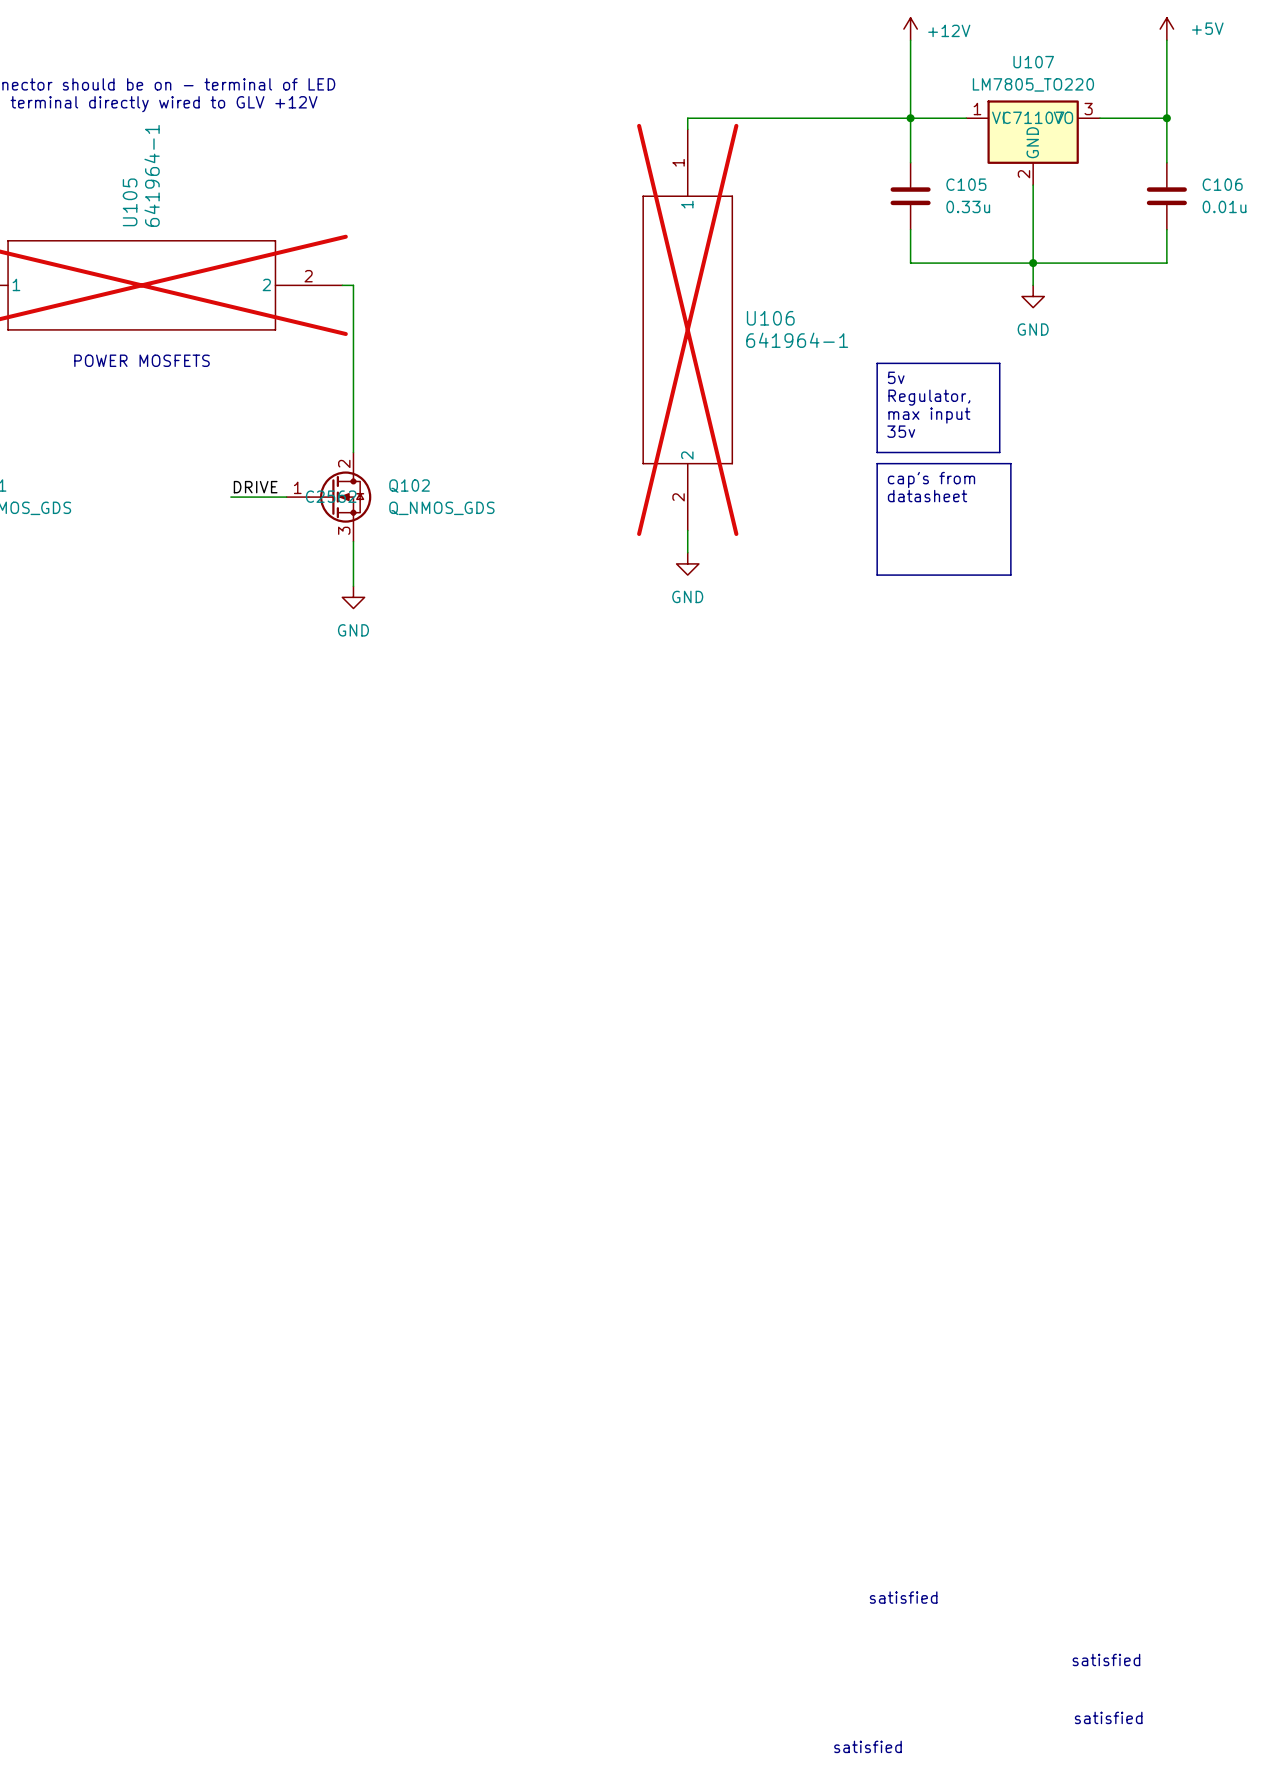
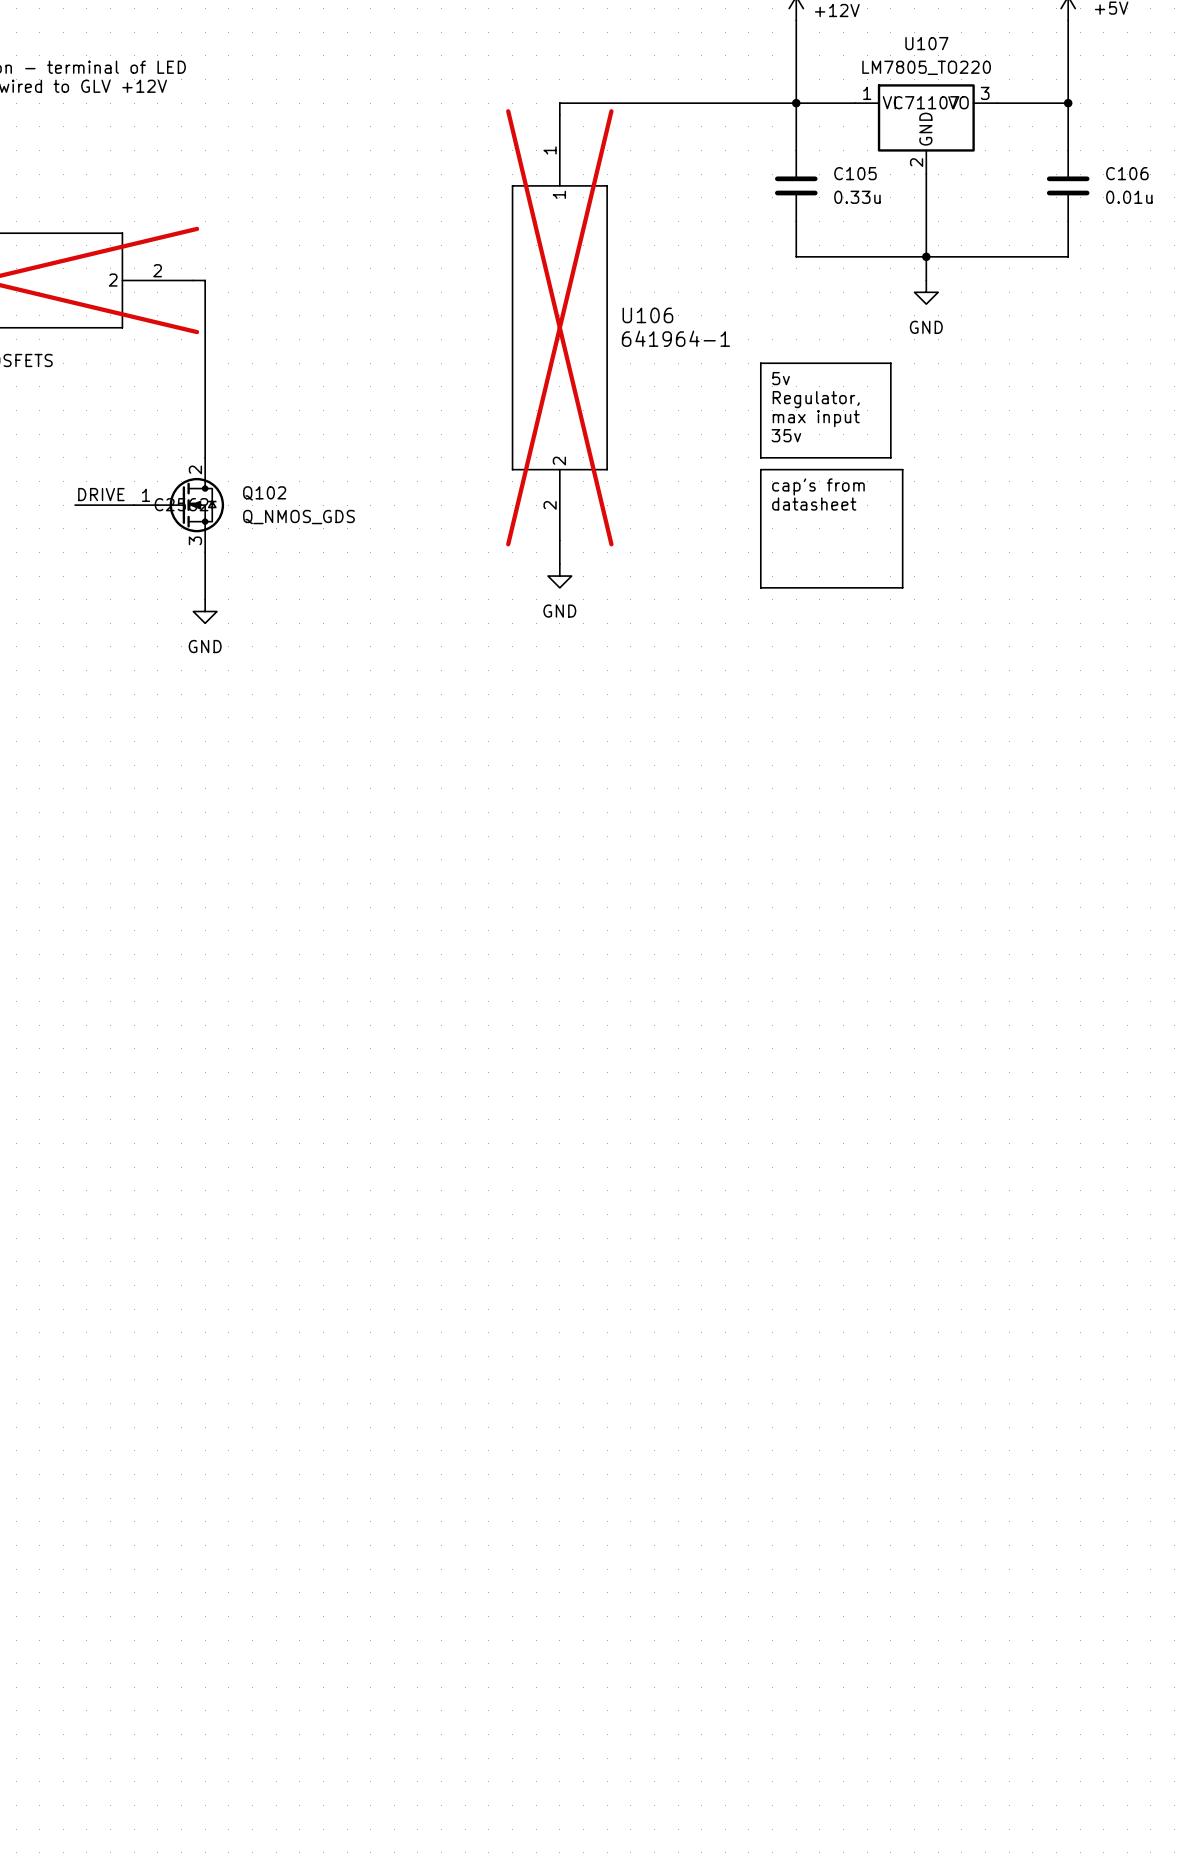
text: satisfied (903, 1597) -> none
text: satisfied (1106, 1659) -> none
text: satisfied (1108, 1717) -> none
text: satisfied (867, 1746) -> none

